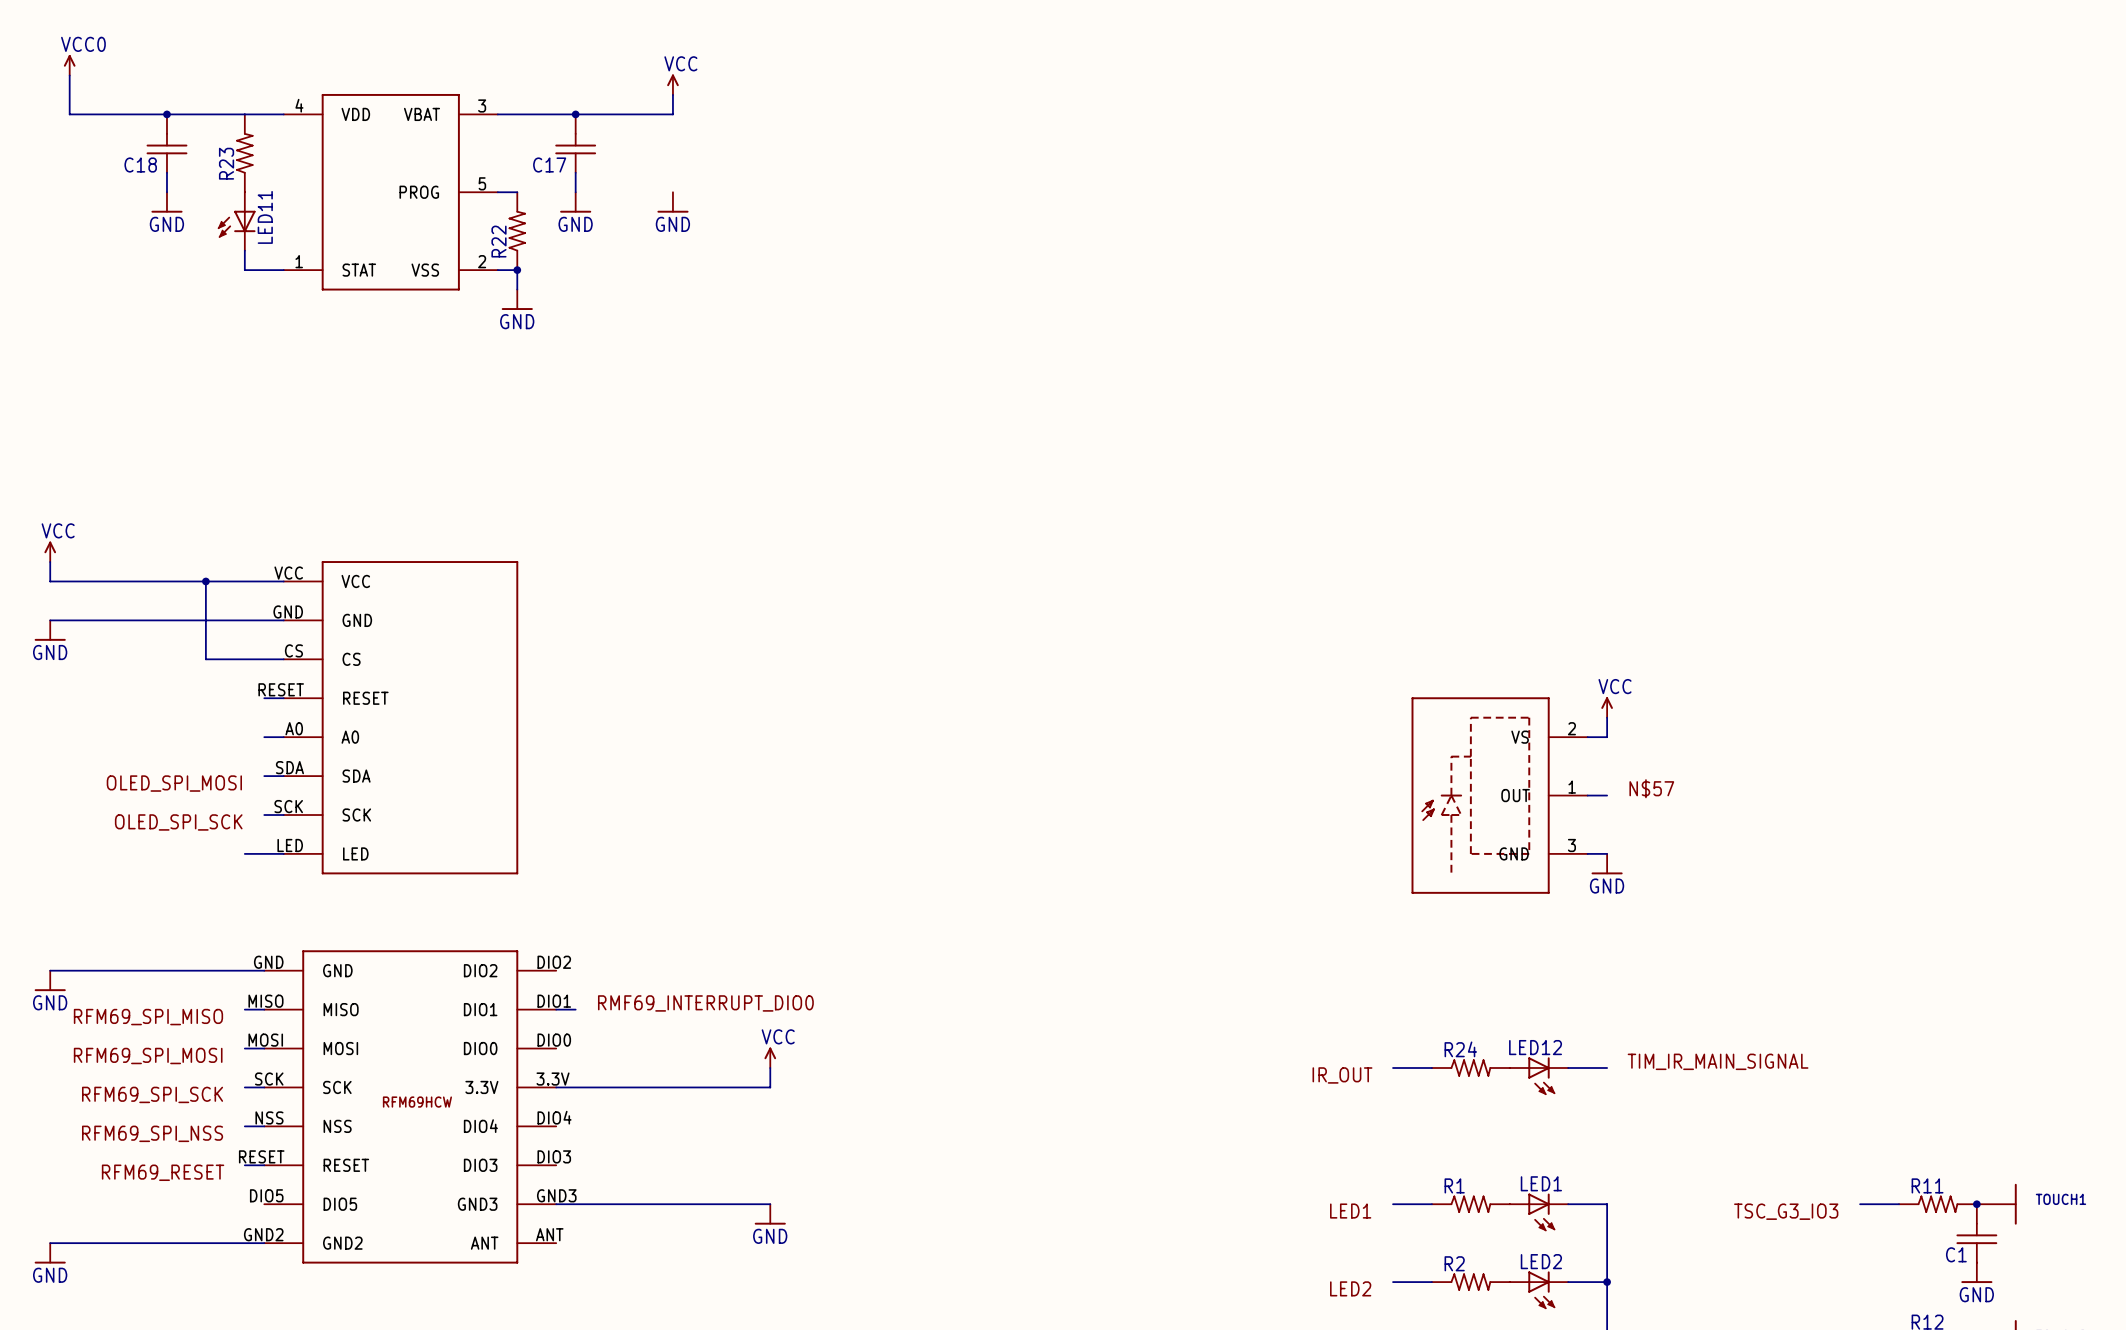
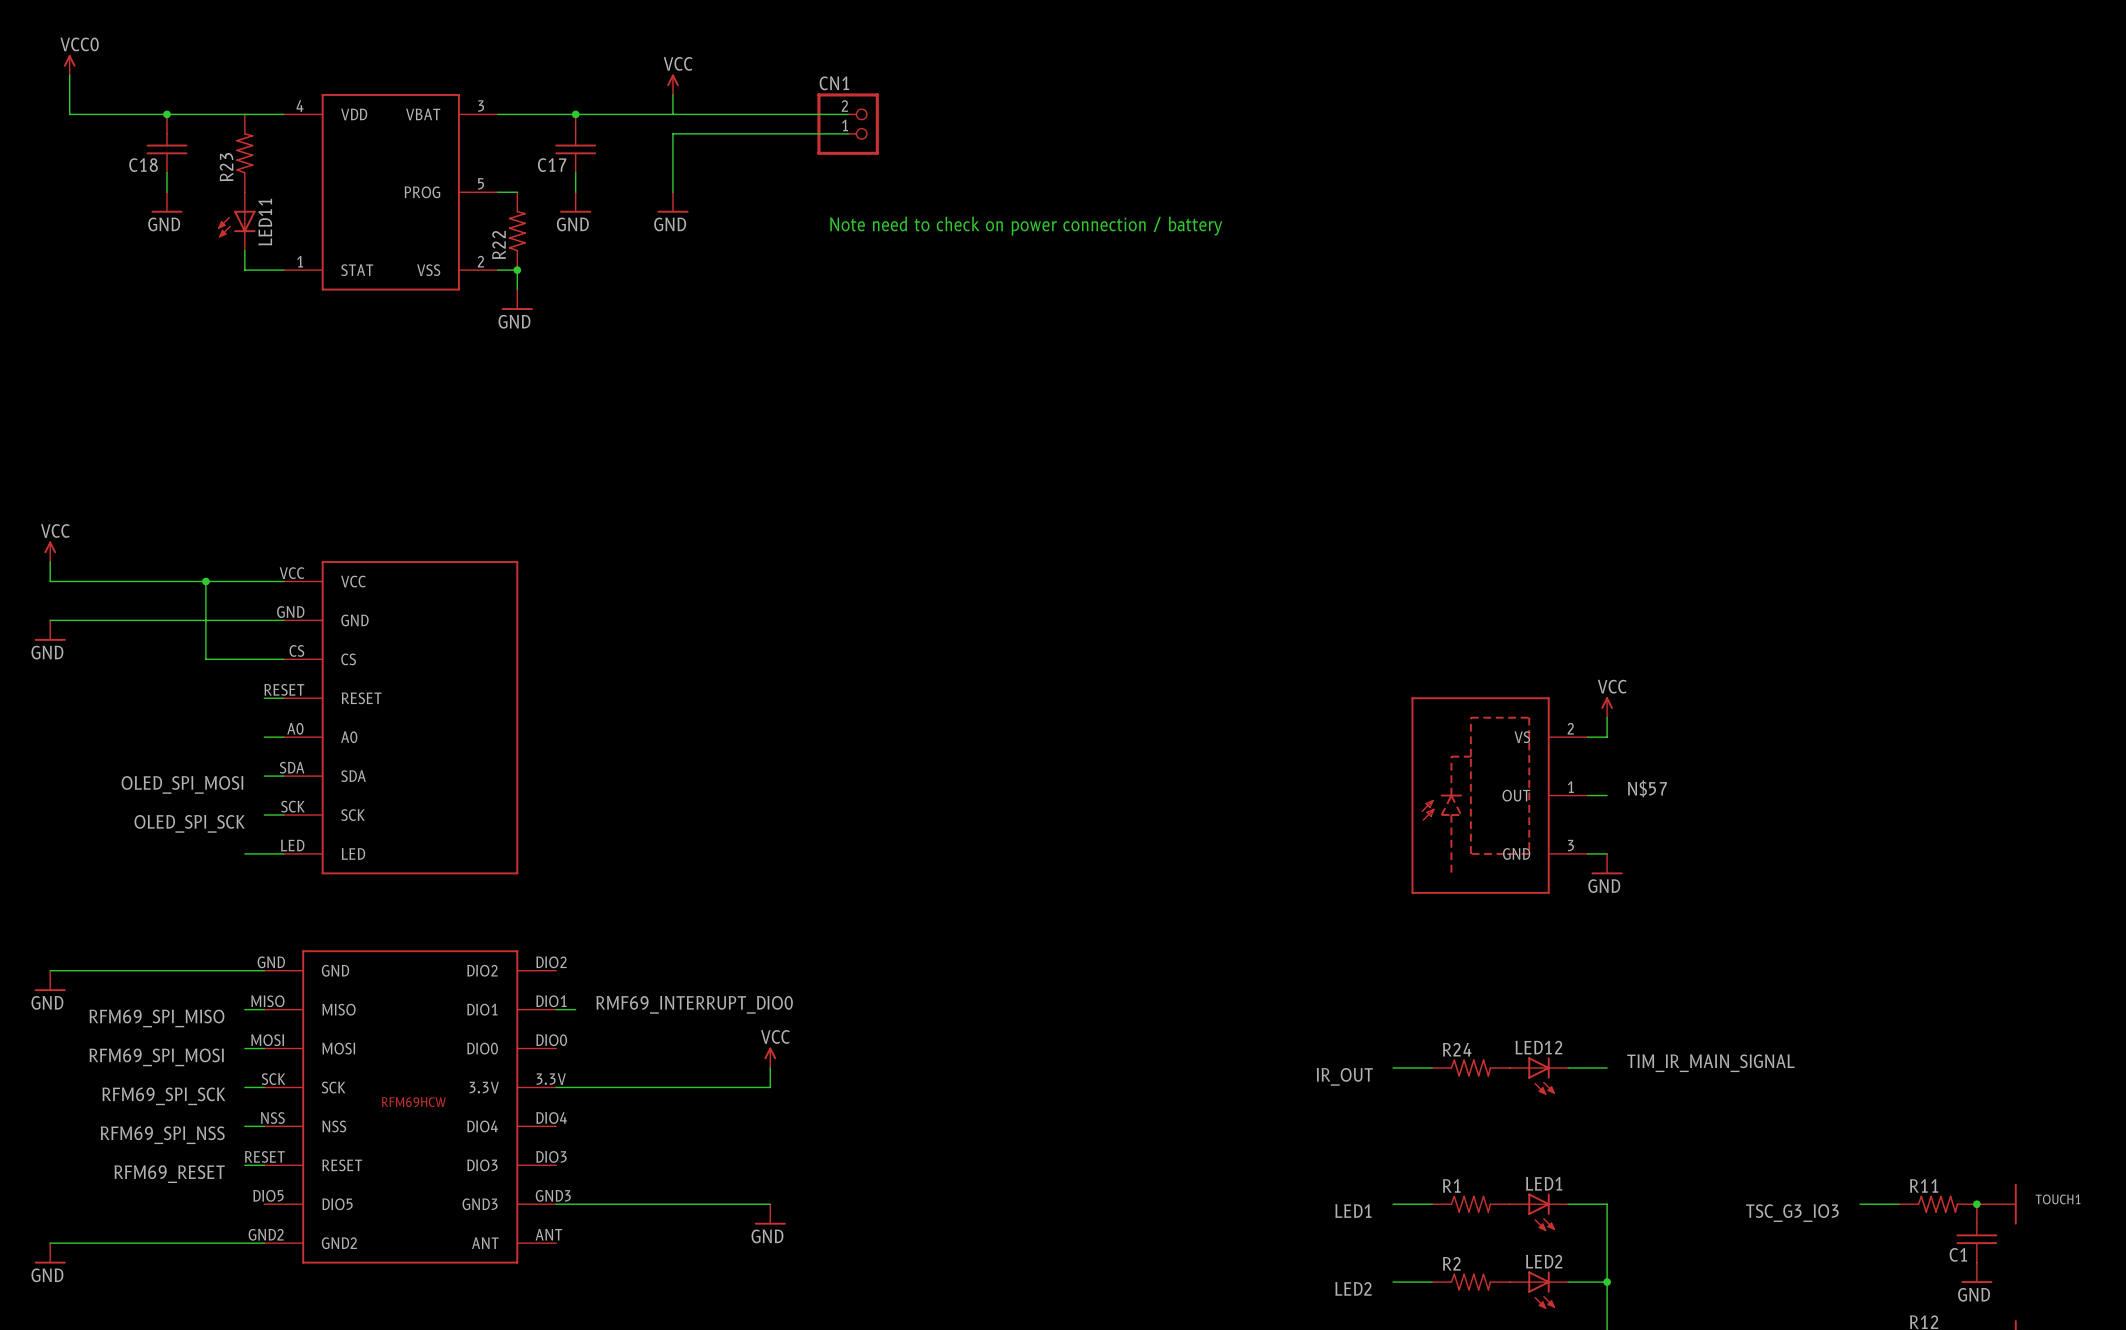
wire: none -> (672, 114) (848, 114)
CN1: none -> (848, 124)
wire: none -> (848, 133) (672, 133) (672, 192)
text: none -> Note need to check on power connection / battery (1026, 226)

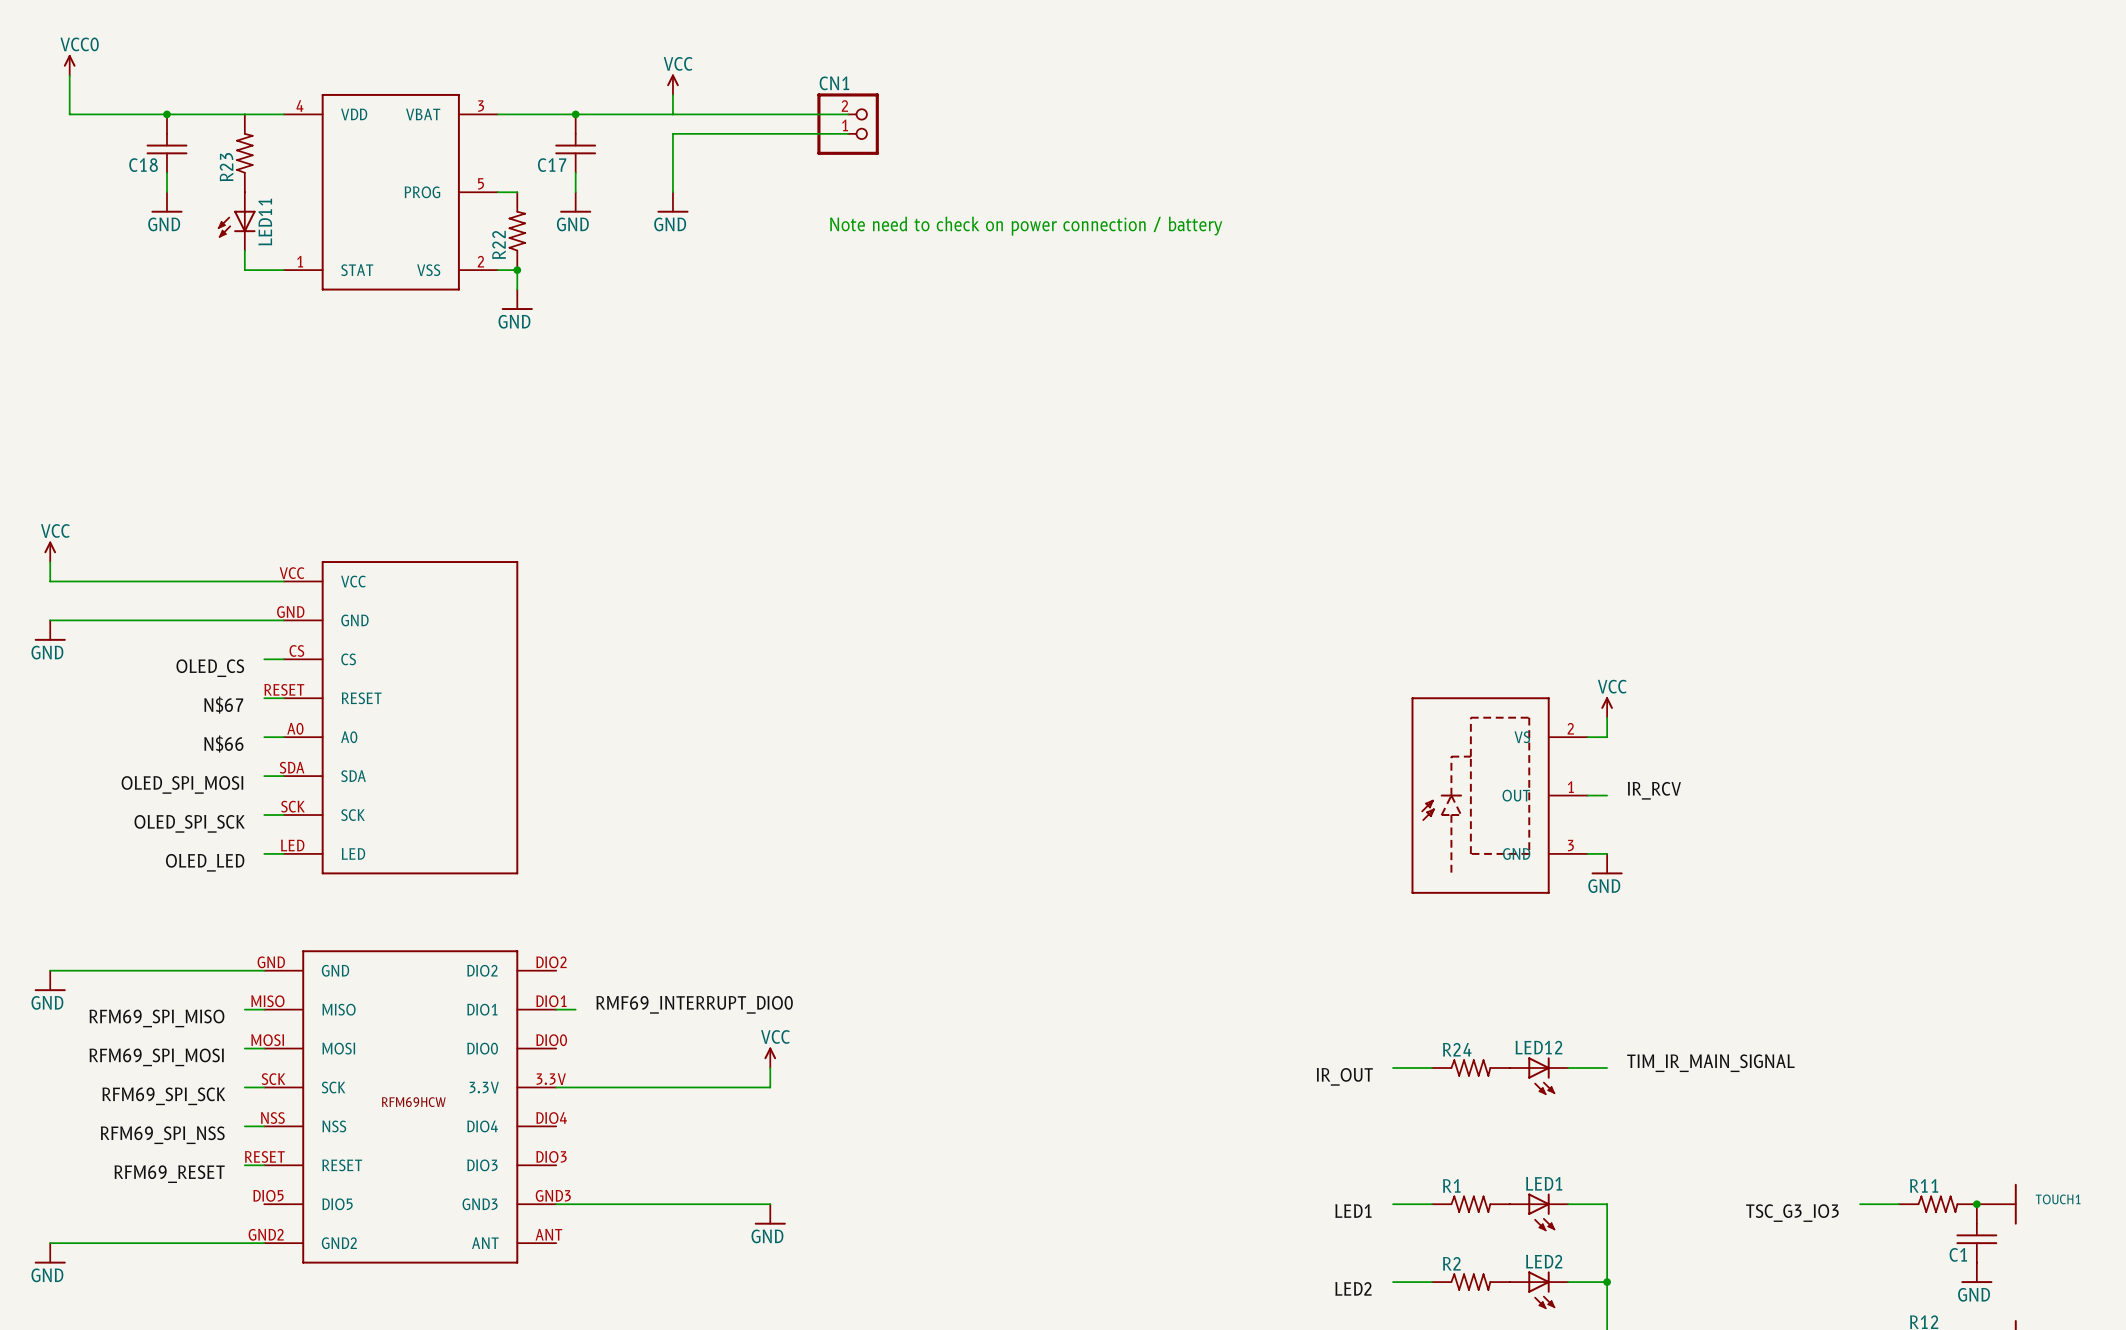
wire: (205, 581) (205, 659) (264, 659) -> none
junction: (205, 581) -> none
label: none -> OLED_CS (210, 668)
label: none -> N$67 (223, 705)
label: none -> N$66 (223, 743)
label: N$57 (1647, 788) -> IR_RCV (1654, 790)
wire: (244, 853) (264, 853) -> none
label: none -> OLED_LED (205, 862)

